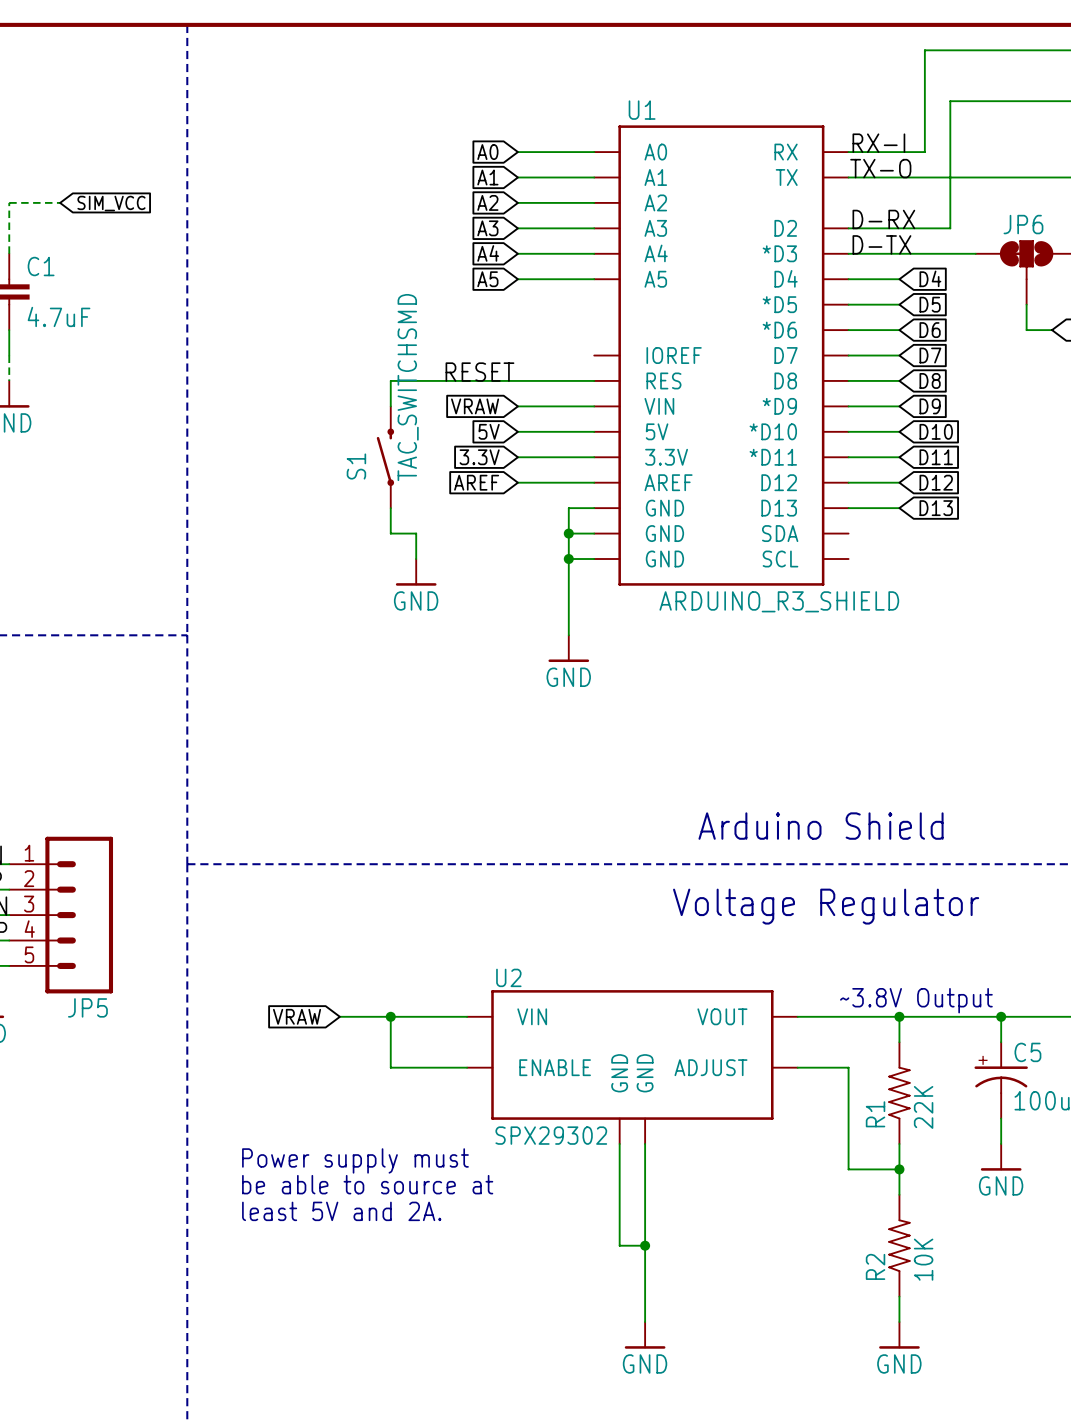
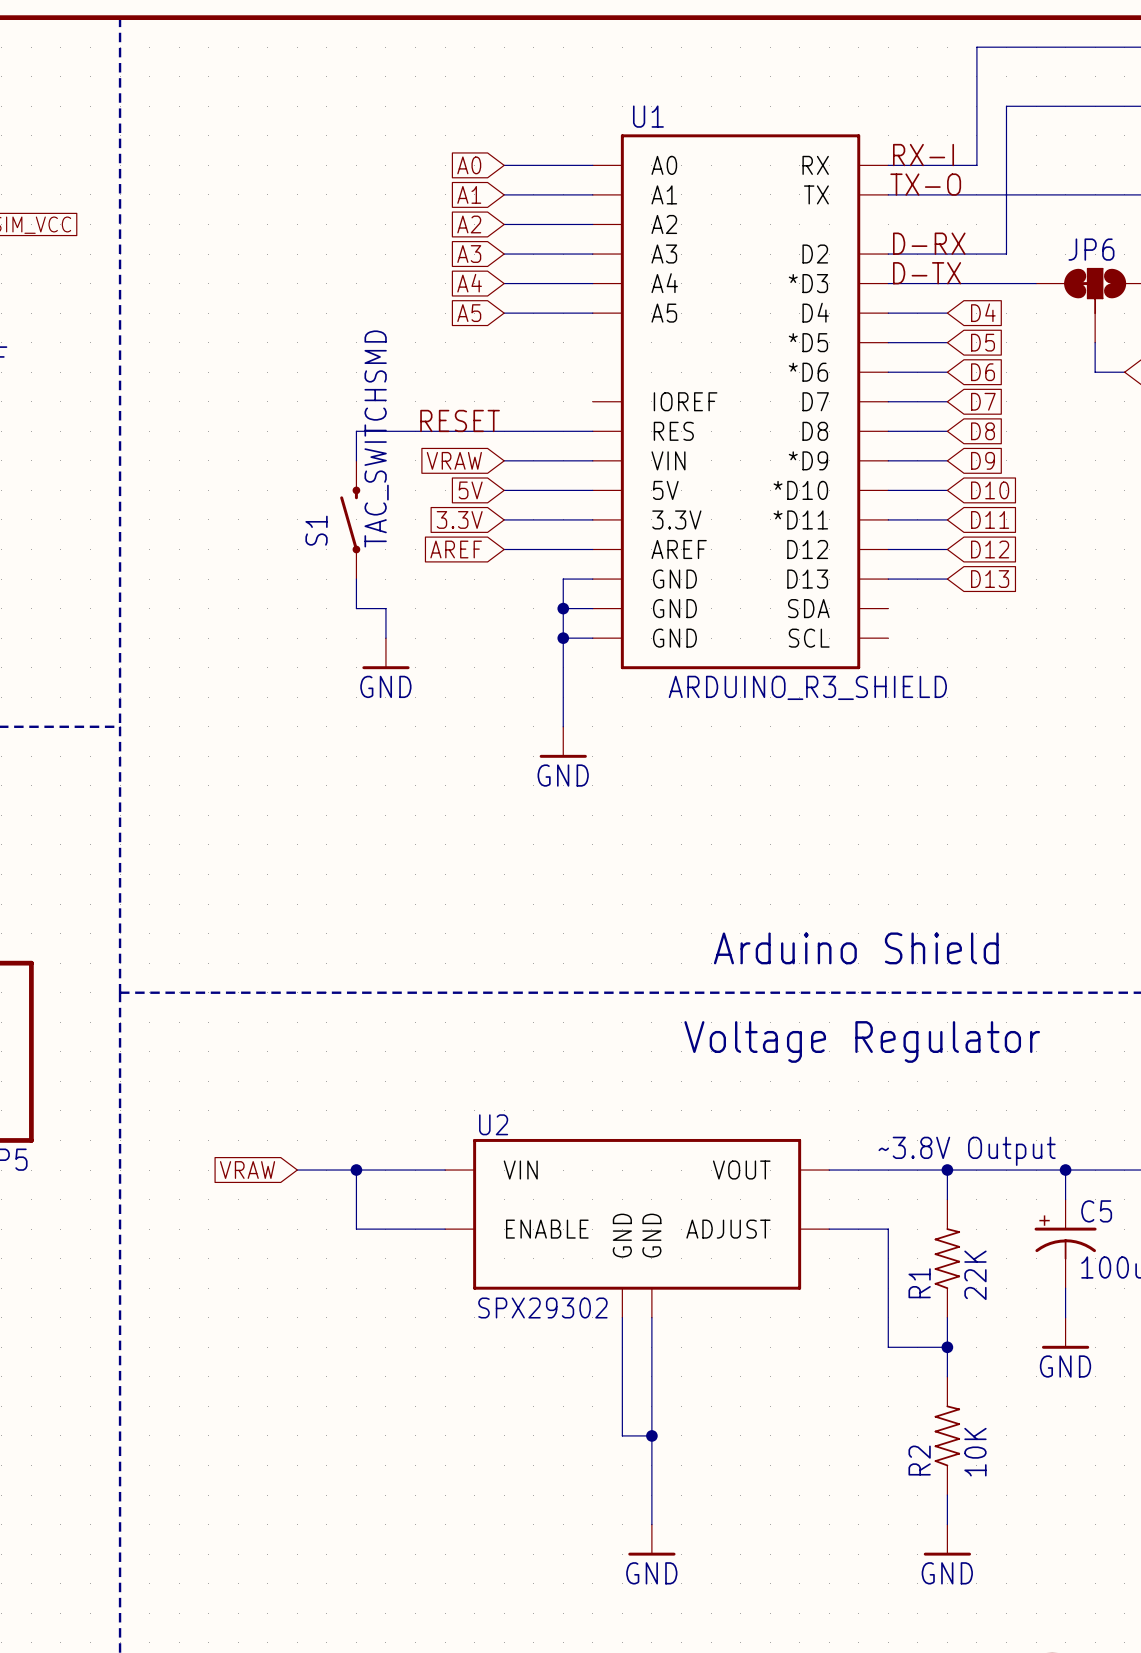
text: Power supply must (355, 1160) -> none
text: be able to source at (367, 1184) -> none
text: least 5V and 2A. (341, 1211) -> none

